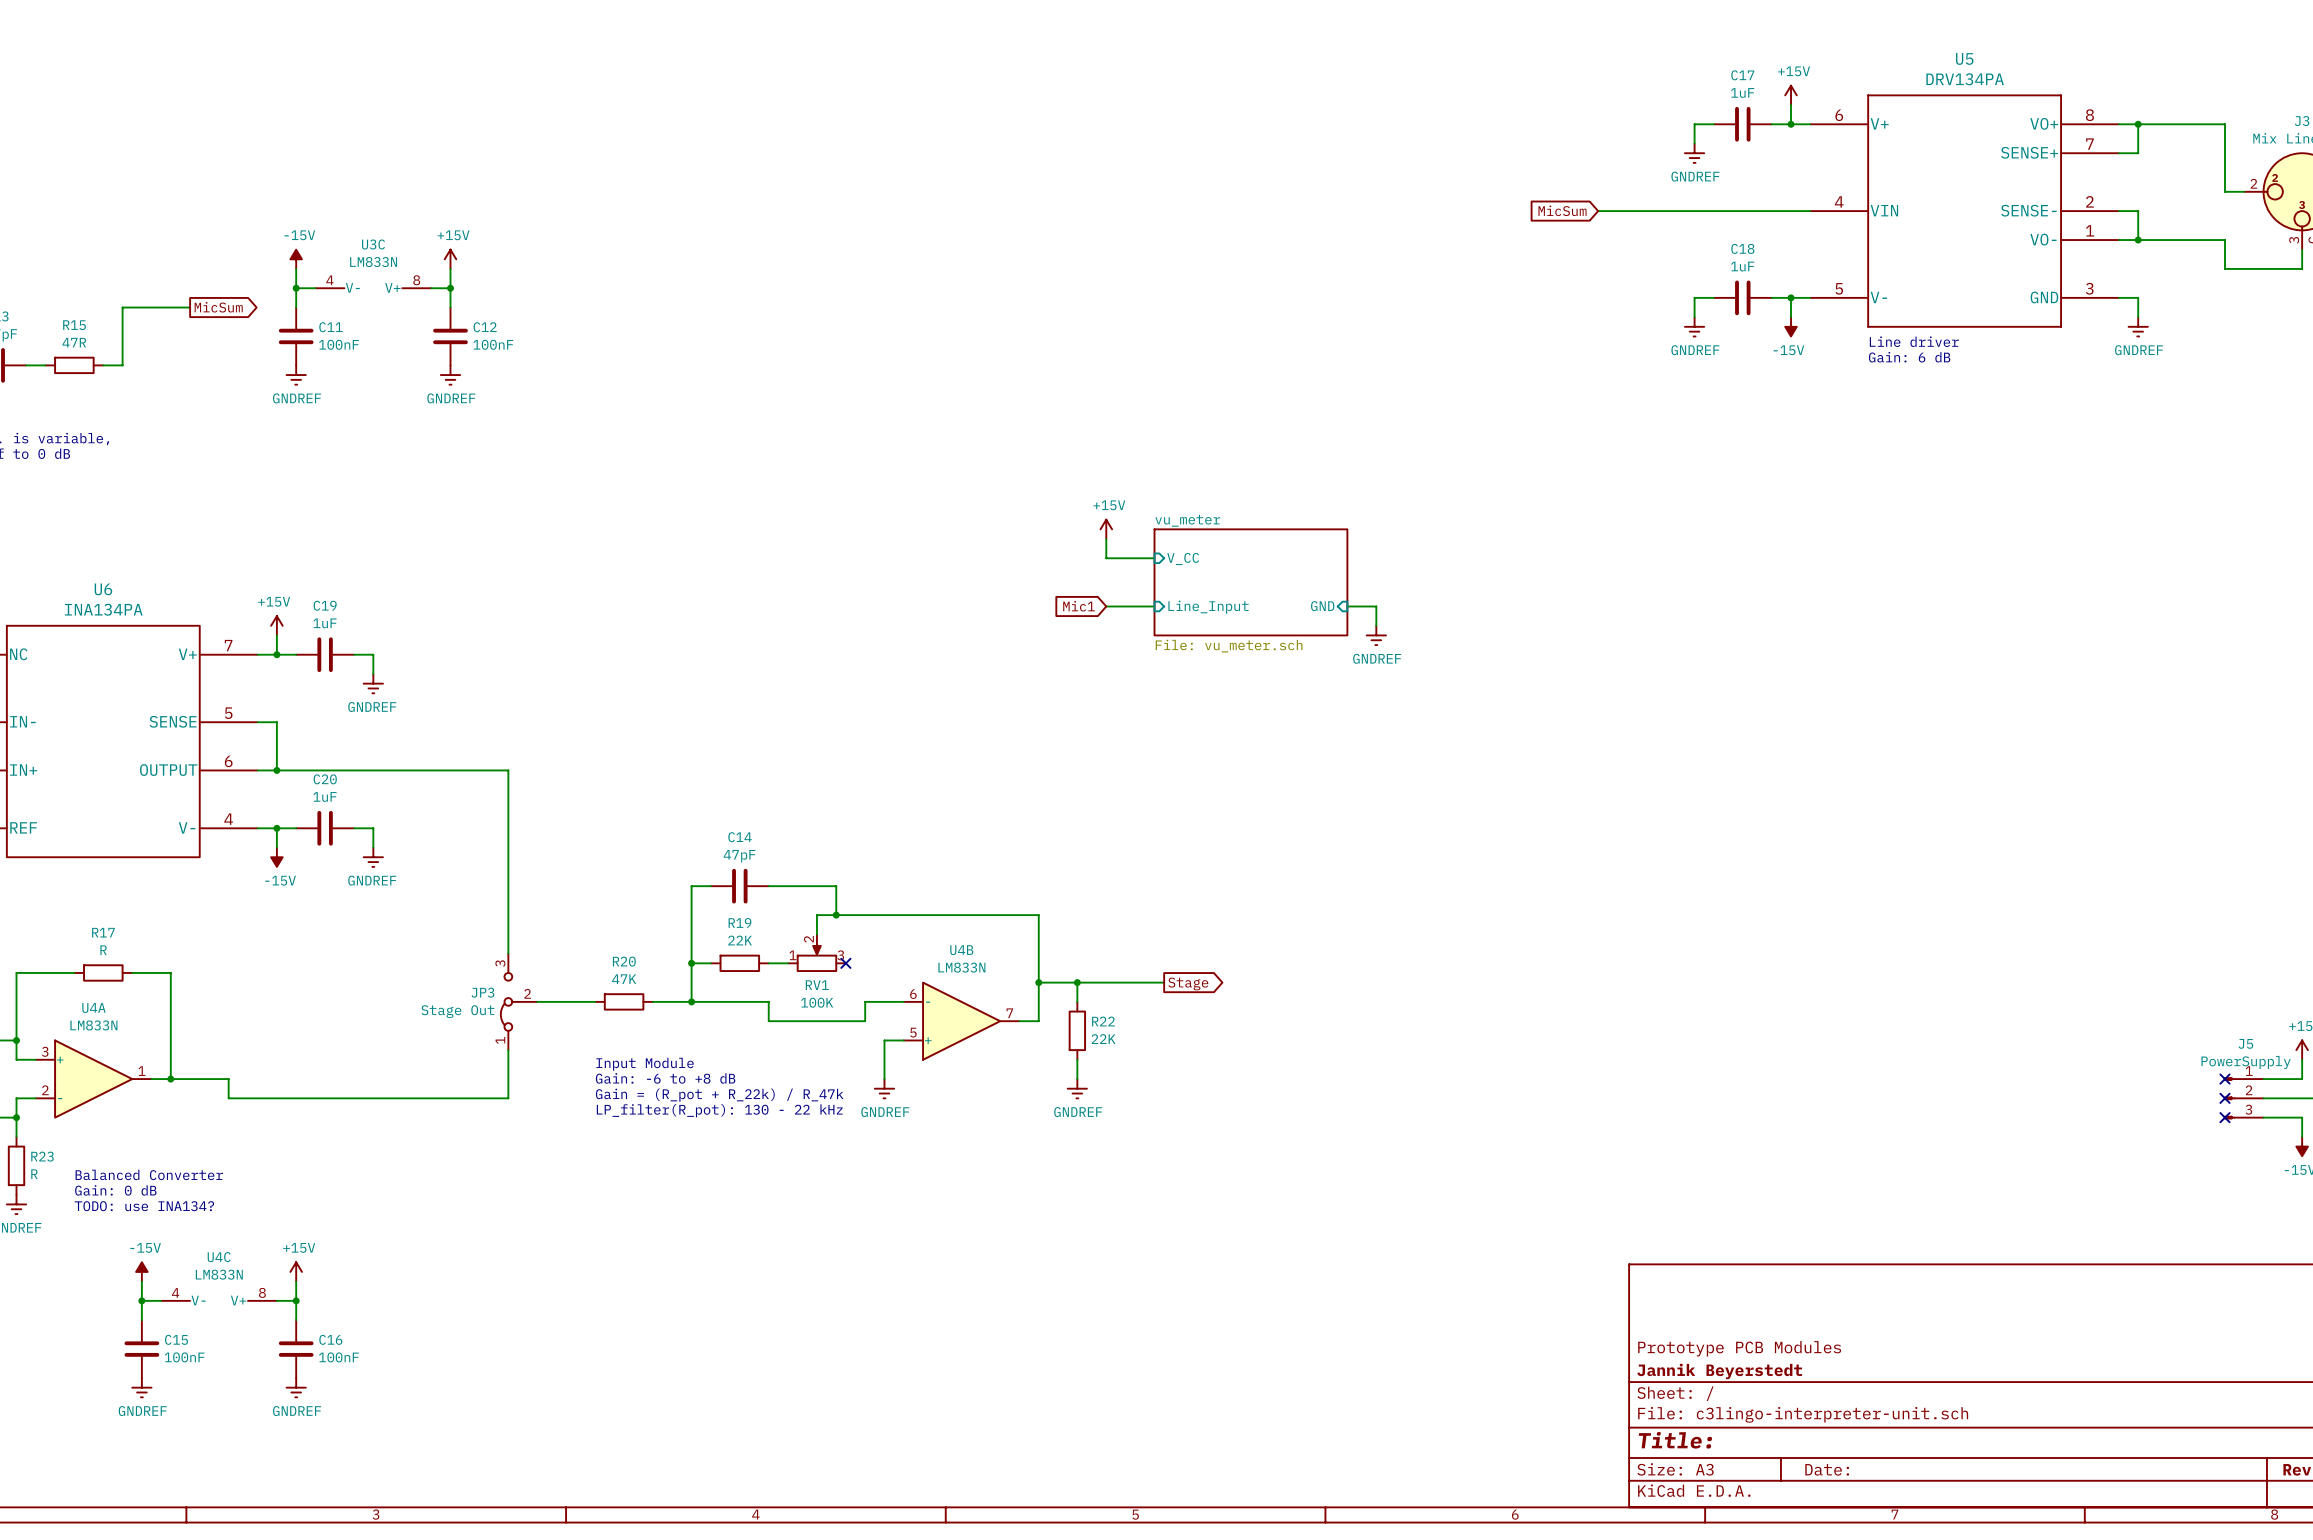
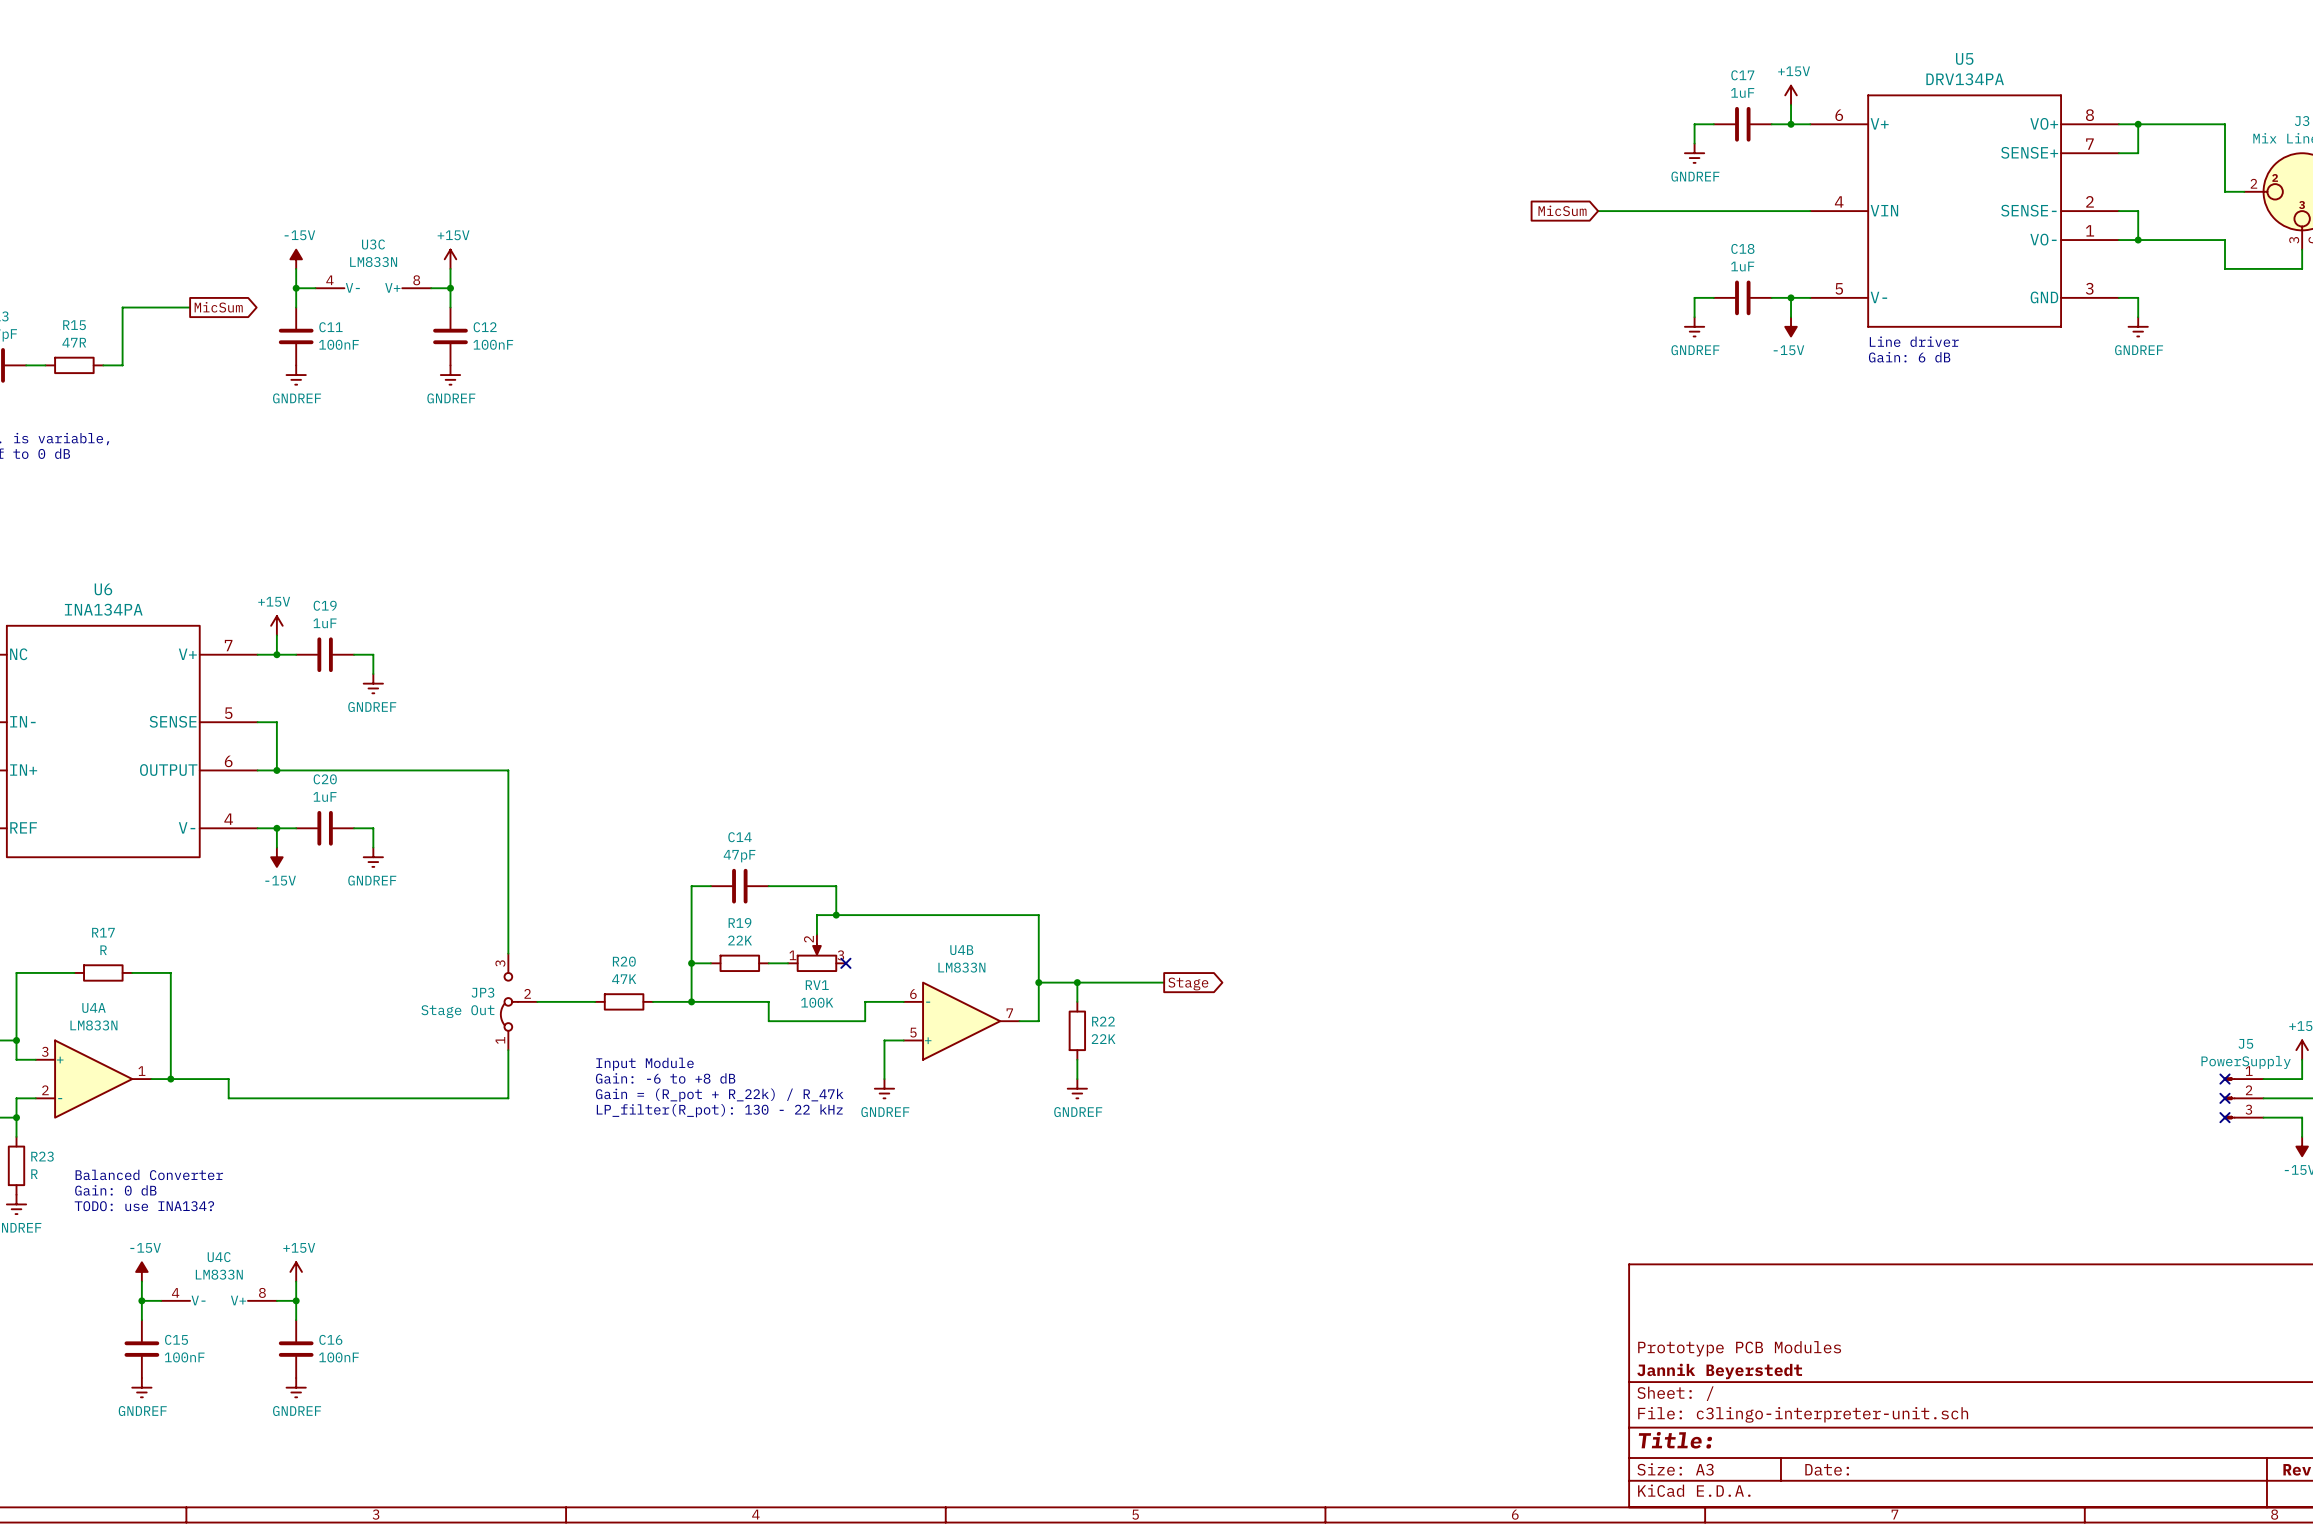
power symbol: +15V (1106, 529) -> none
wire: (1106, 538) (1106, 558) (1154, 558) -> none
sheet pin: V_CC (1183, 559) -> none
sheet vu_meter: File: vu_meter.sch (1250, 582) -> none
global label: Mic1 (1079, 606) -> none
wire: (1106, 606) (1154, 606) -> none
sheet pin: GND (1322, 606) -> none
wire: (1347, 606) (1376, 606) (1376, 625) -> none
sheet pin: Line_Input (1208, 607) -> none
power symbol: GNDREF (1376, 635) -> none

